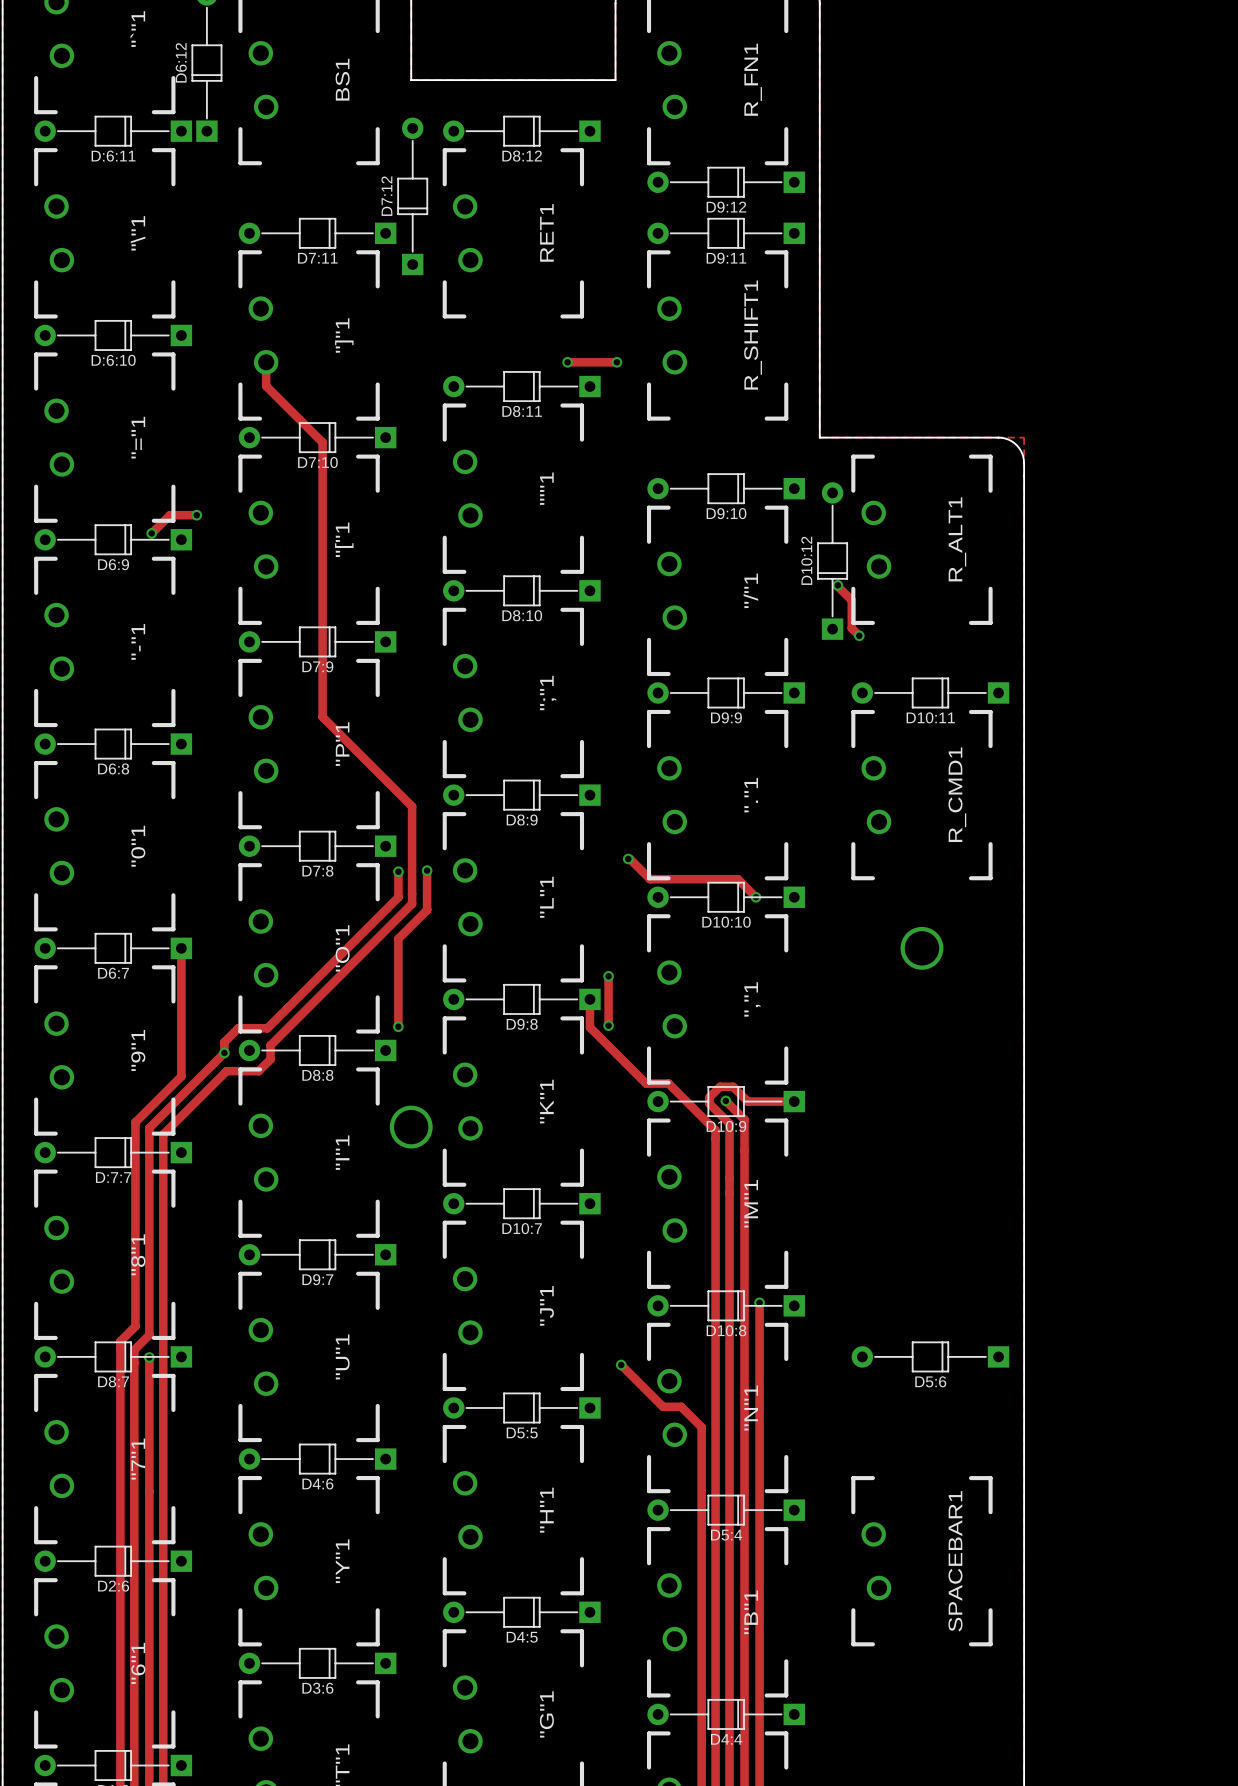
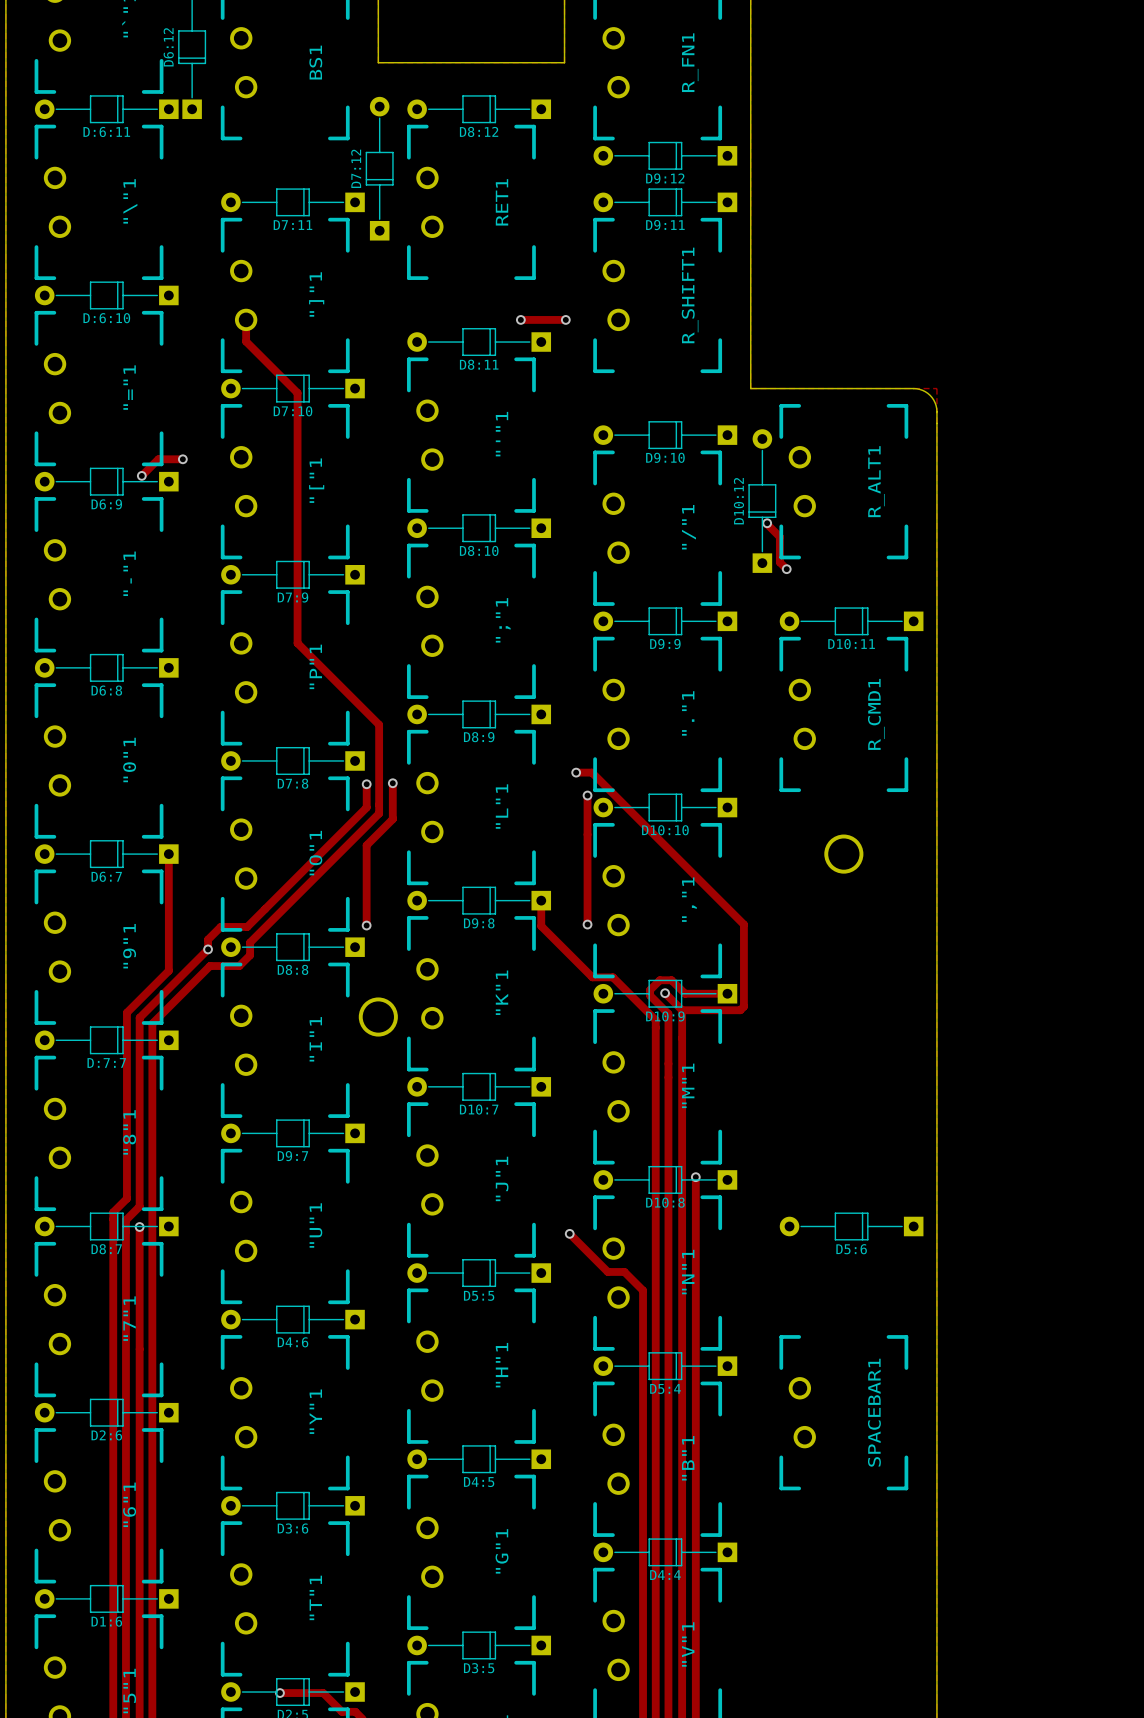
track: (629, 858) (650, 879) (737, 879) (755, 897) -> (577, 772) (592, 772) (743, 924) (743, 1006) (740, 1010) (682, 1010)
track: none -> (587, 795) (587, 924)
via: none -> (587, 795)
via: (755, 897) -> none
track: (608, 976) (608, 1025) -> none
via: (608, 976) -> none
via: (608, 1025) -> none
via: none -> (587, 924)

